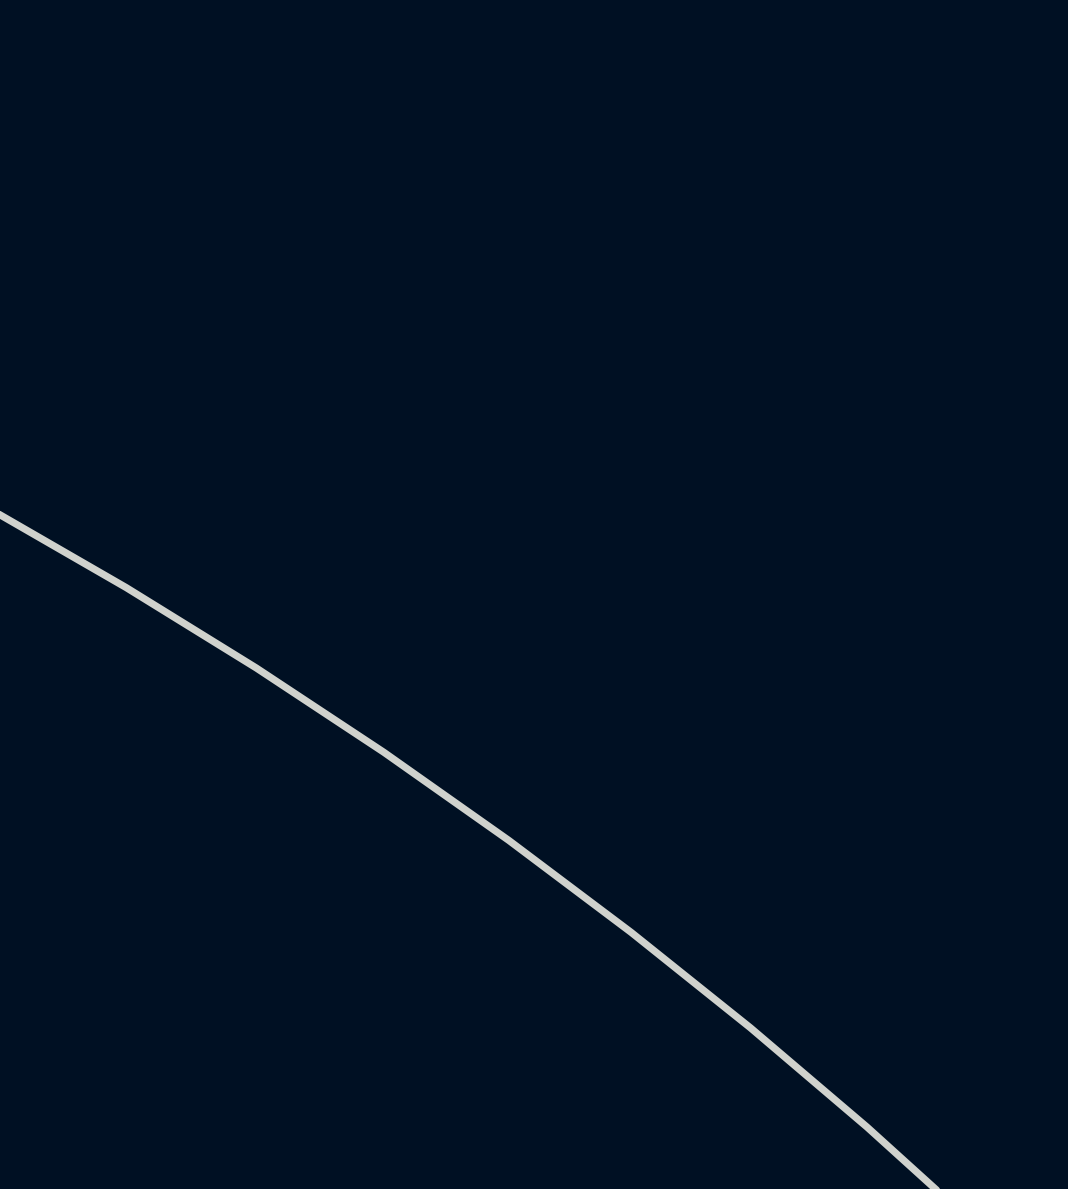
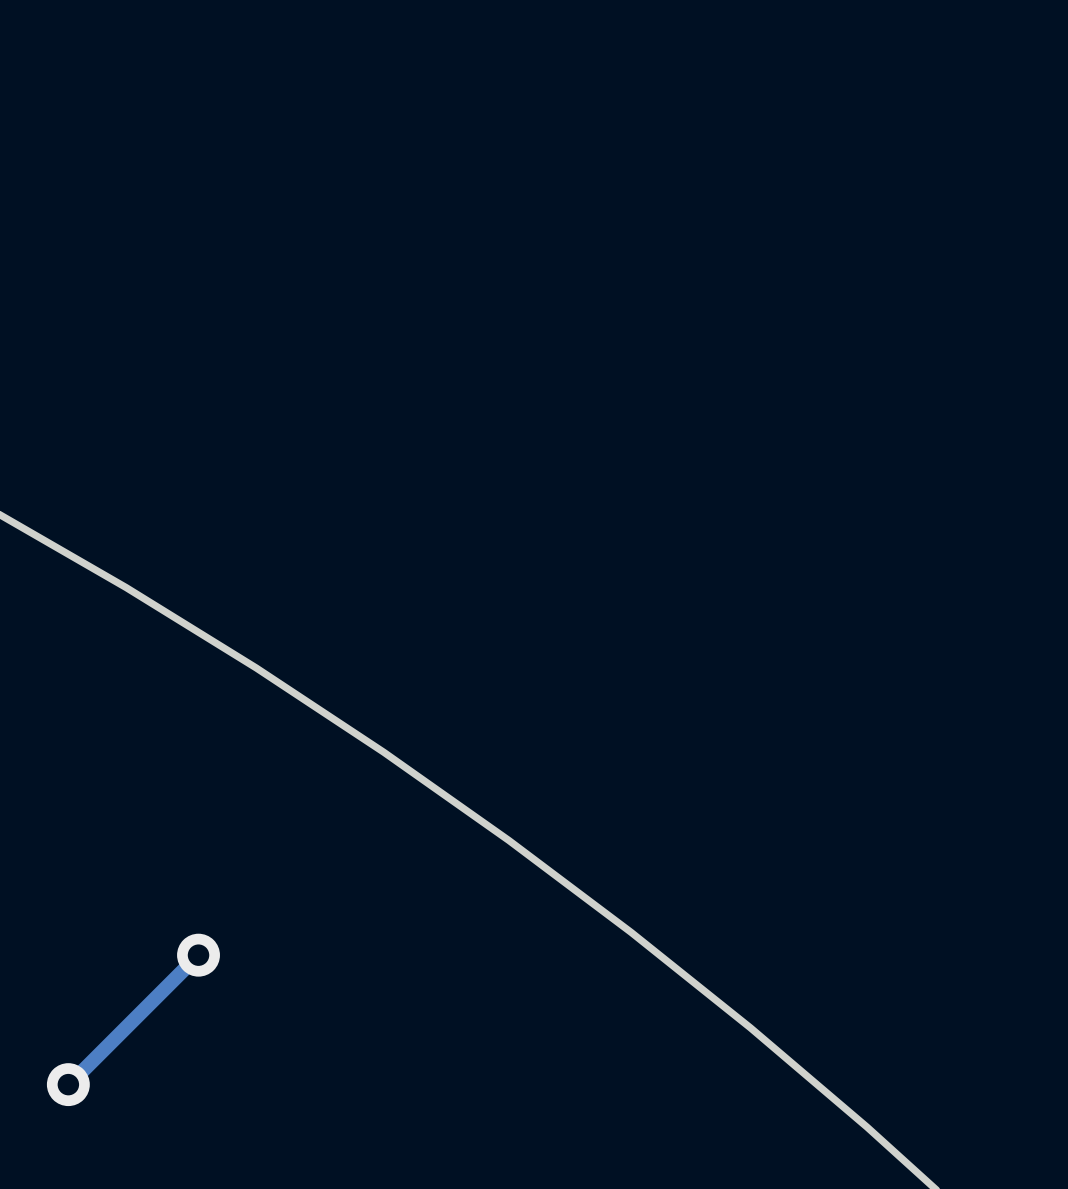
track: none -> (198, 955) (69, 1084)
via: none -> (198, 955)
via: none -> (68, 1084)

